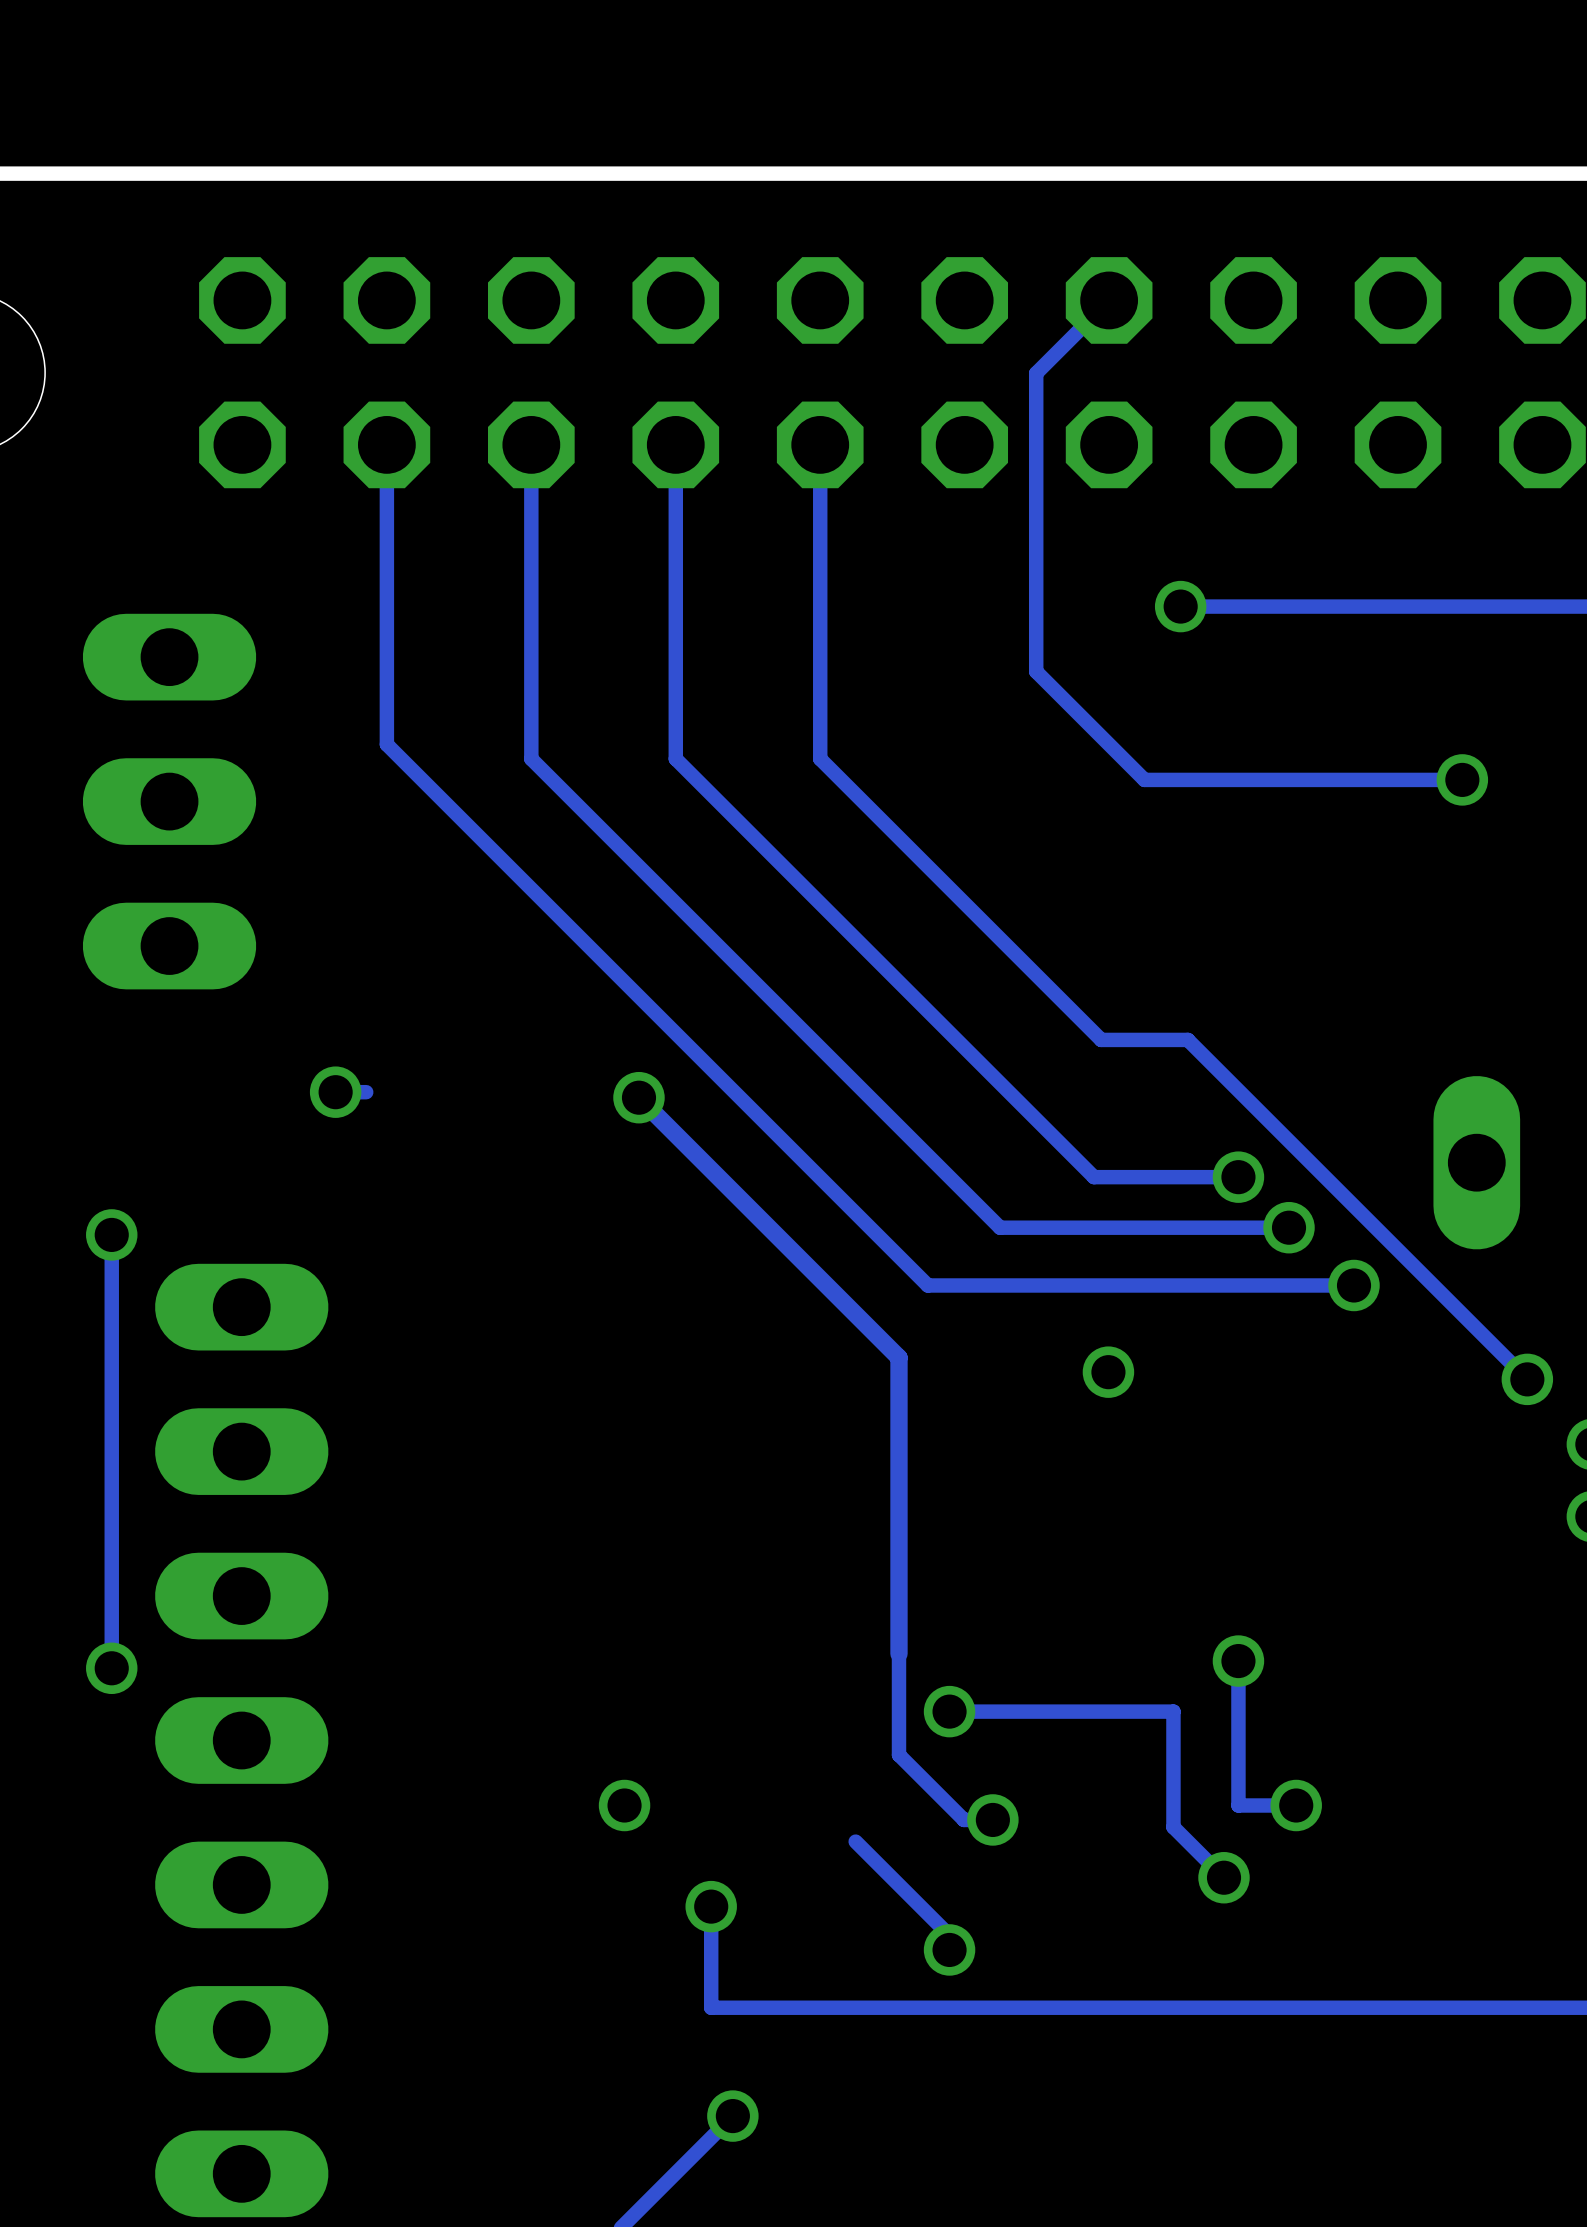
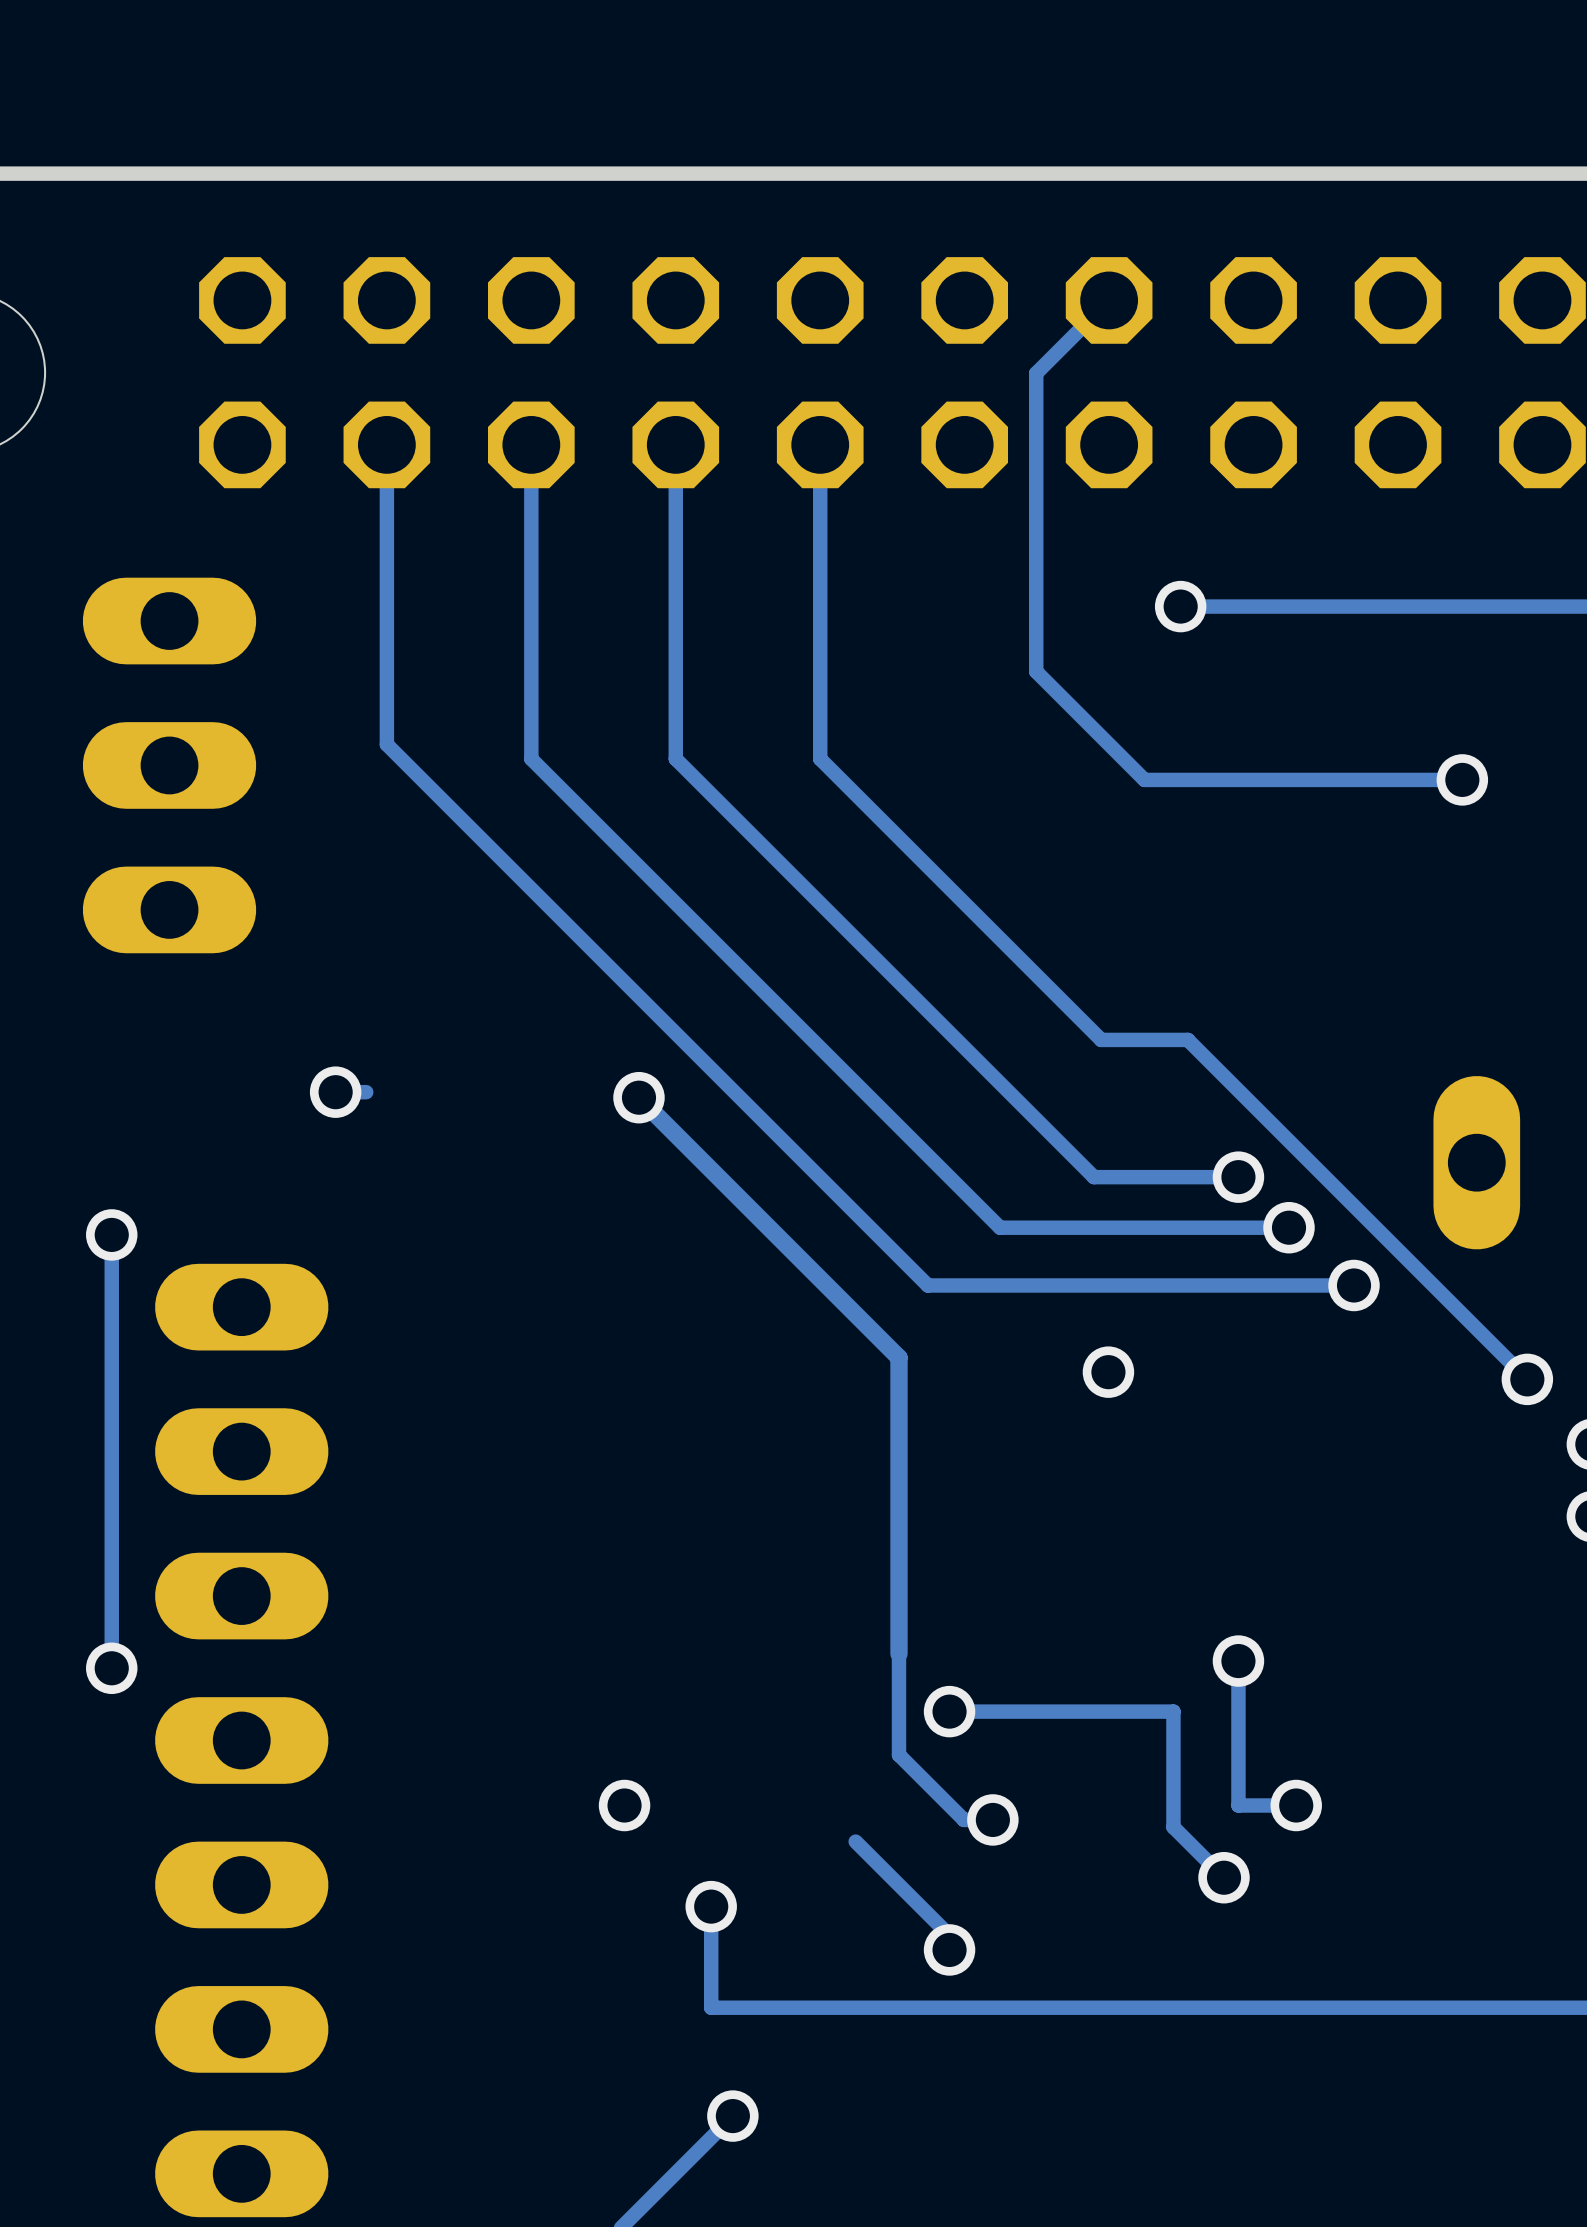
part position: (169, 801) -> (169, 765)

